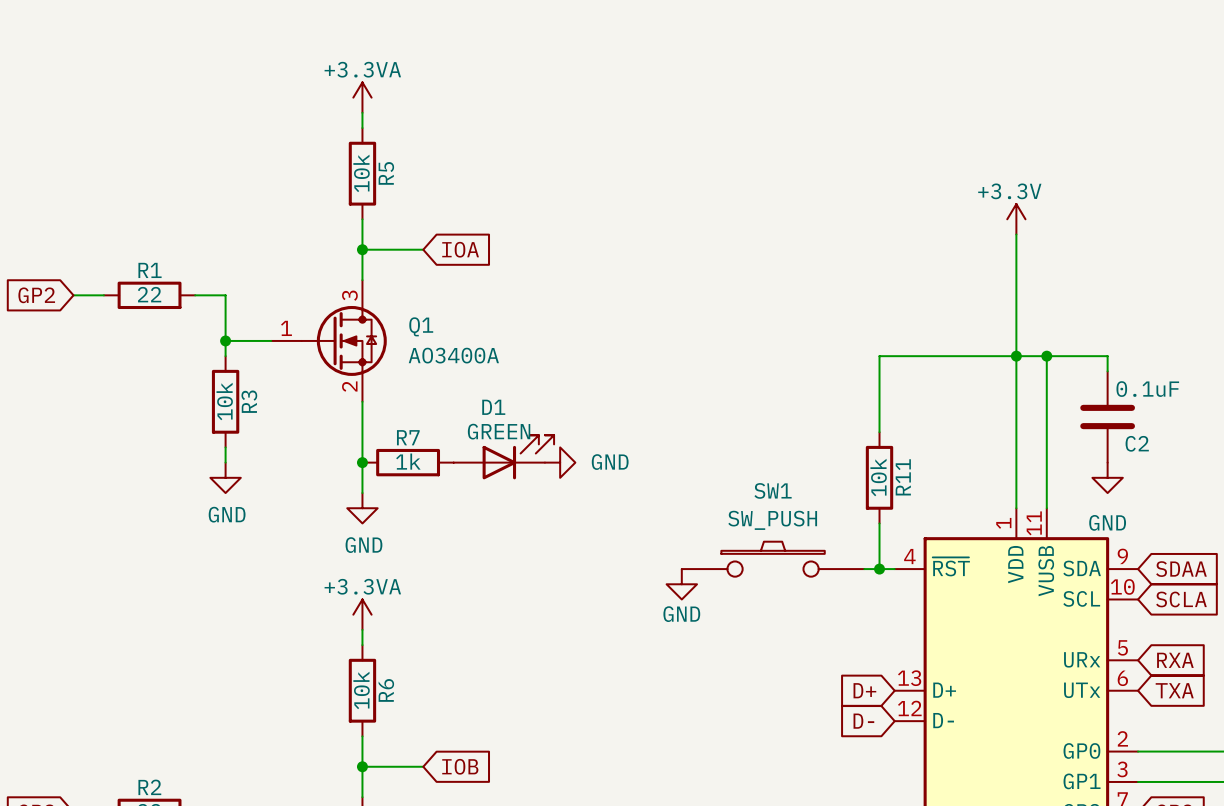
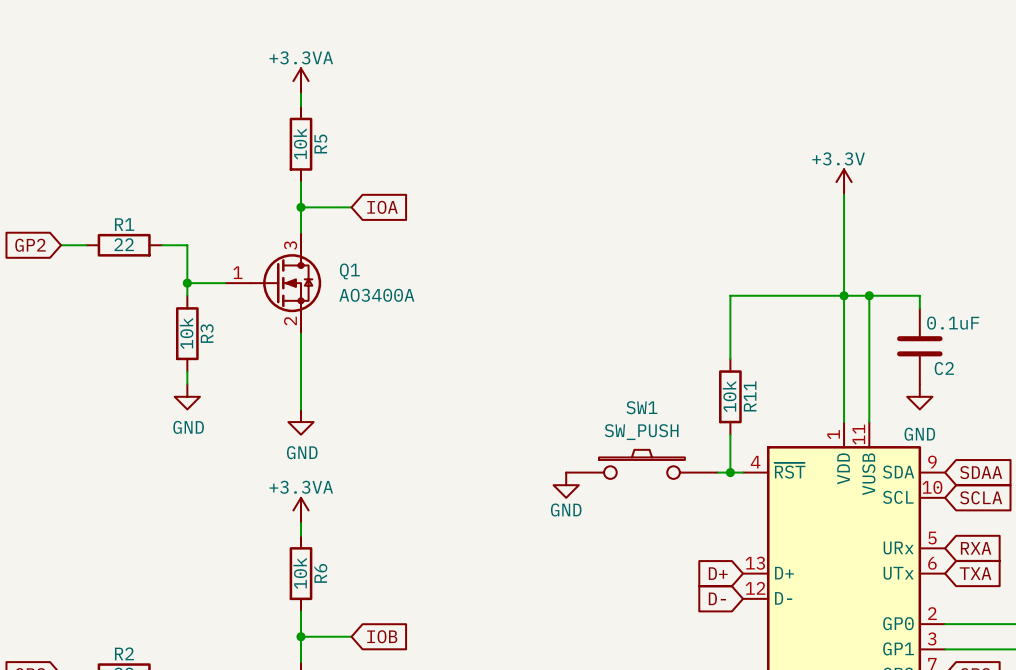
D1: GREEN (503, 457) -> none
junction: (362, 462) -> none
R7: 1k (408, 462) -> none
power symbol: GND (560, 462) -> none

